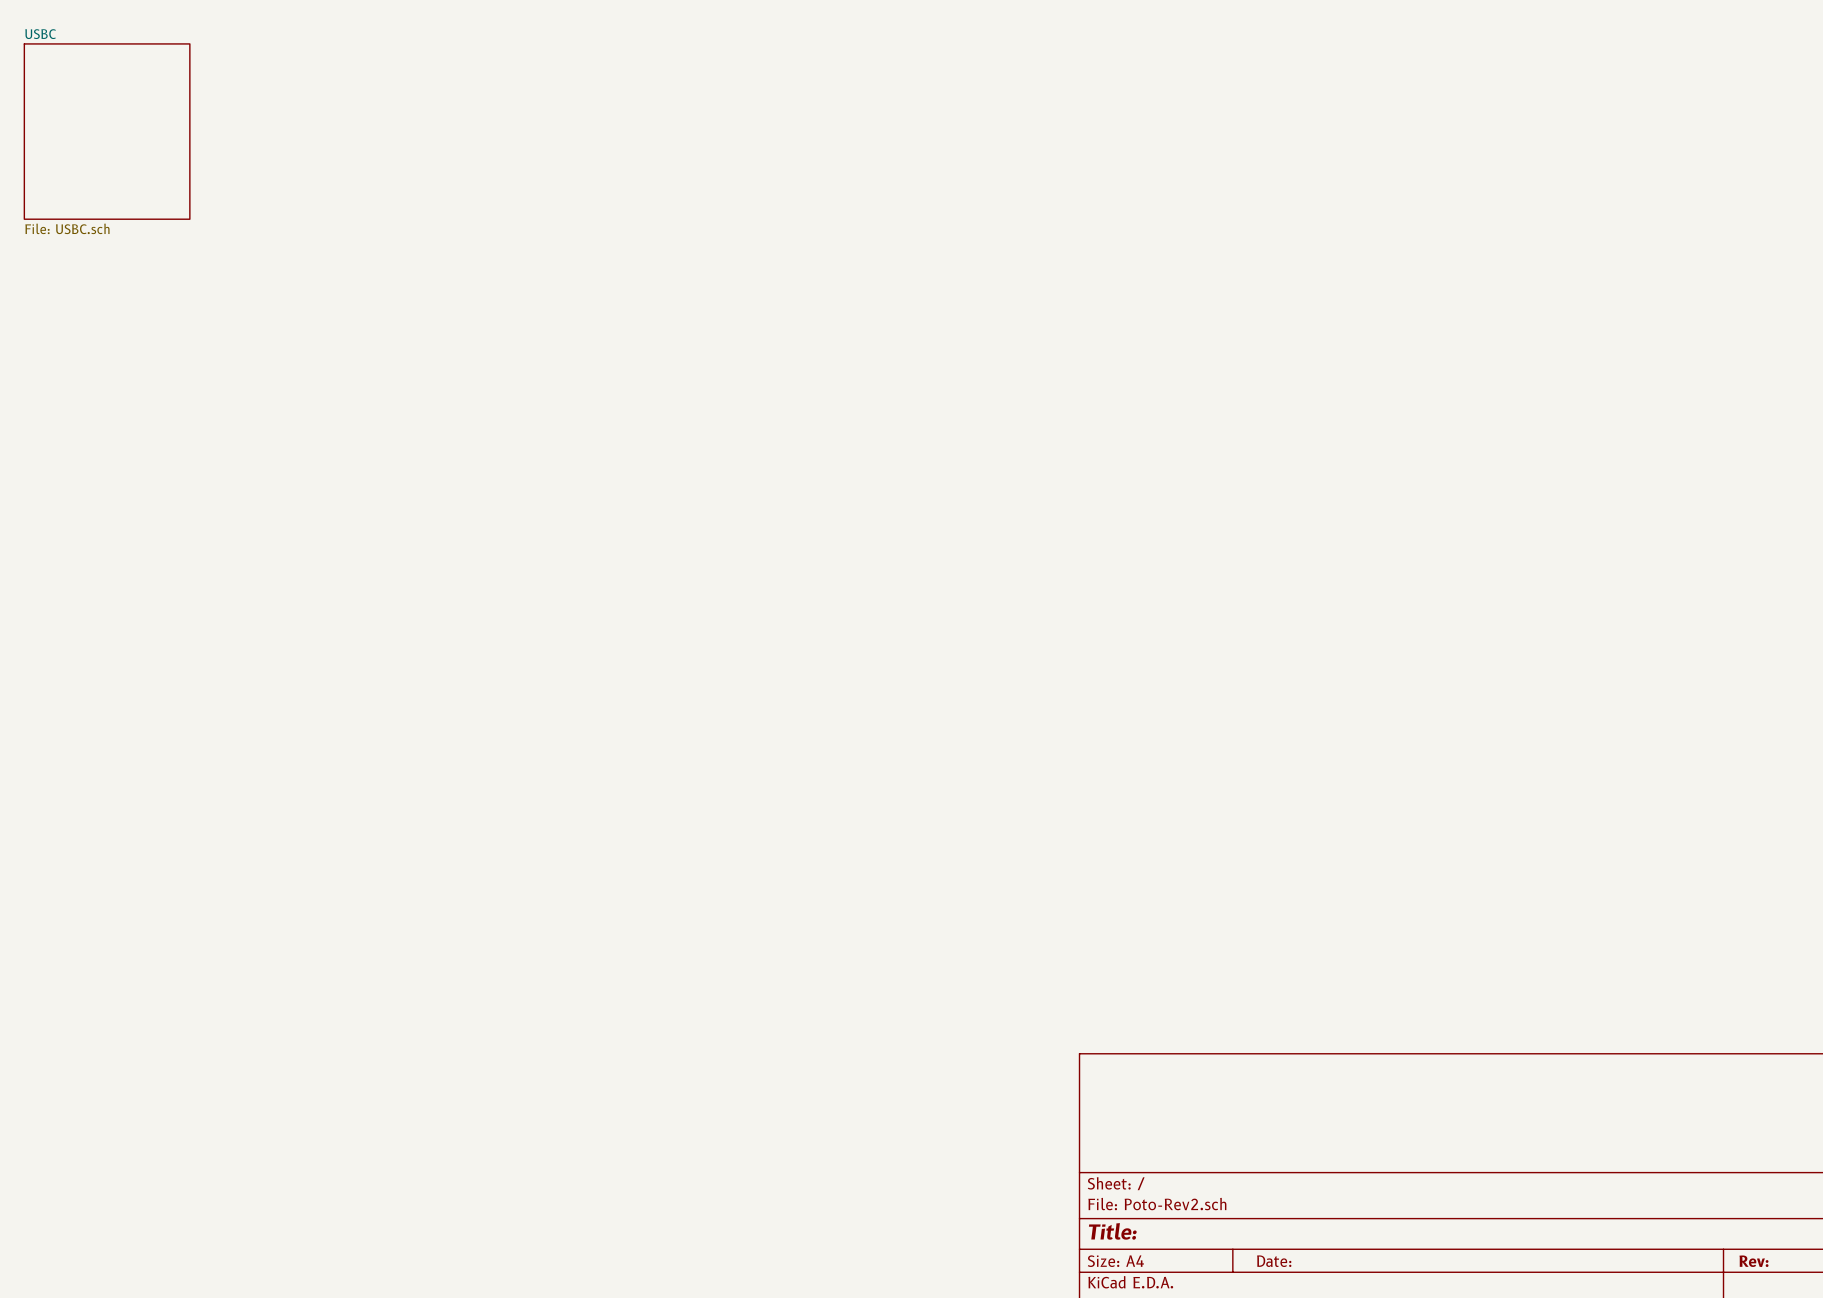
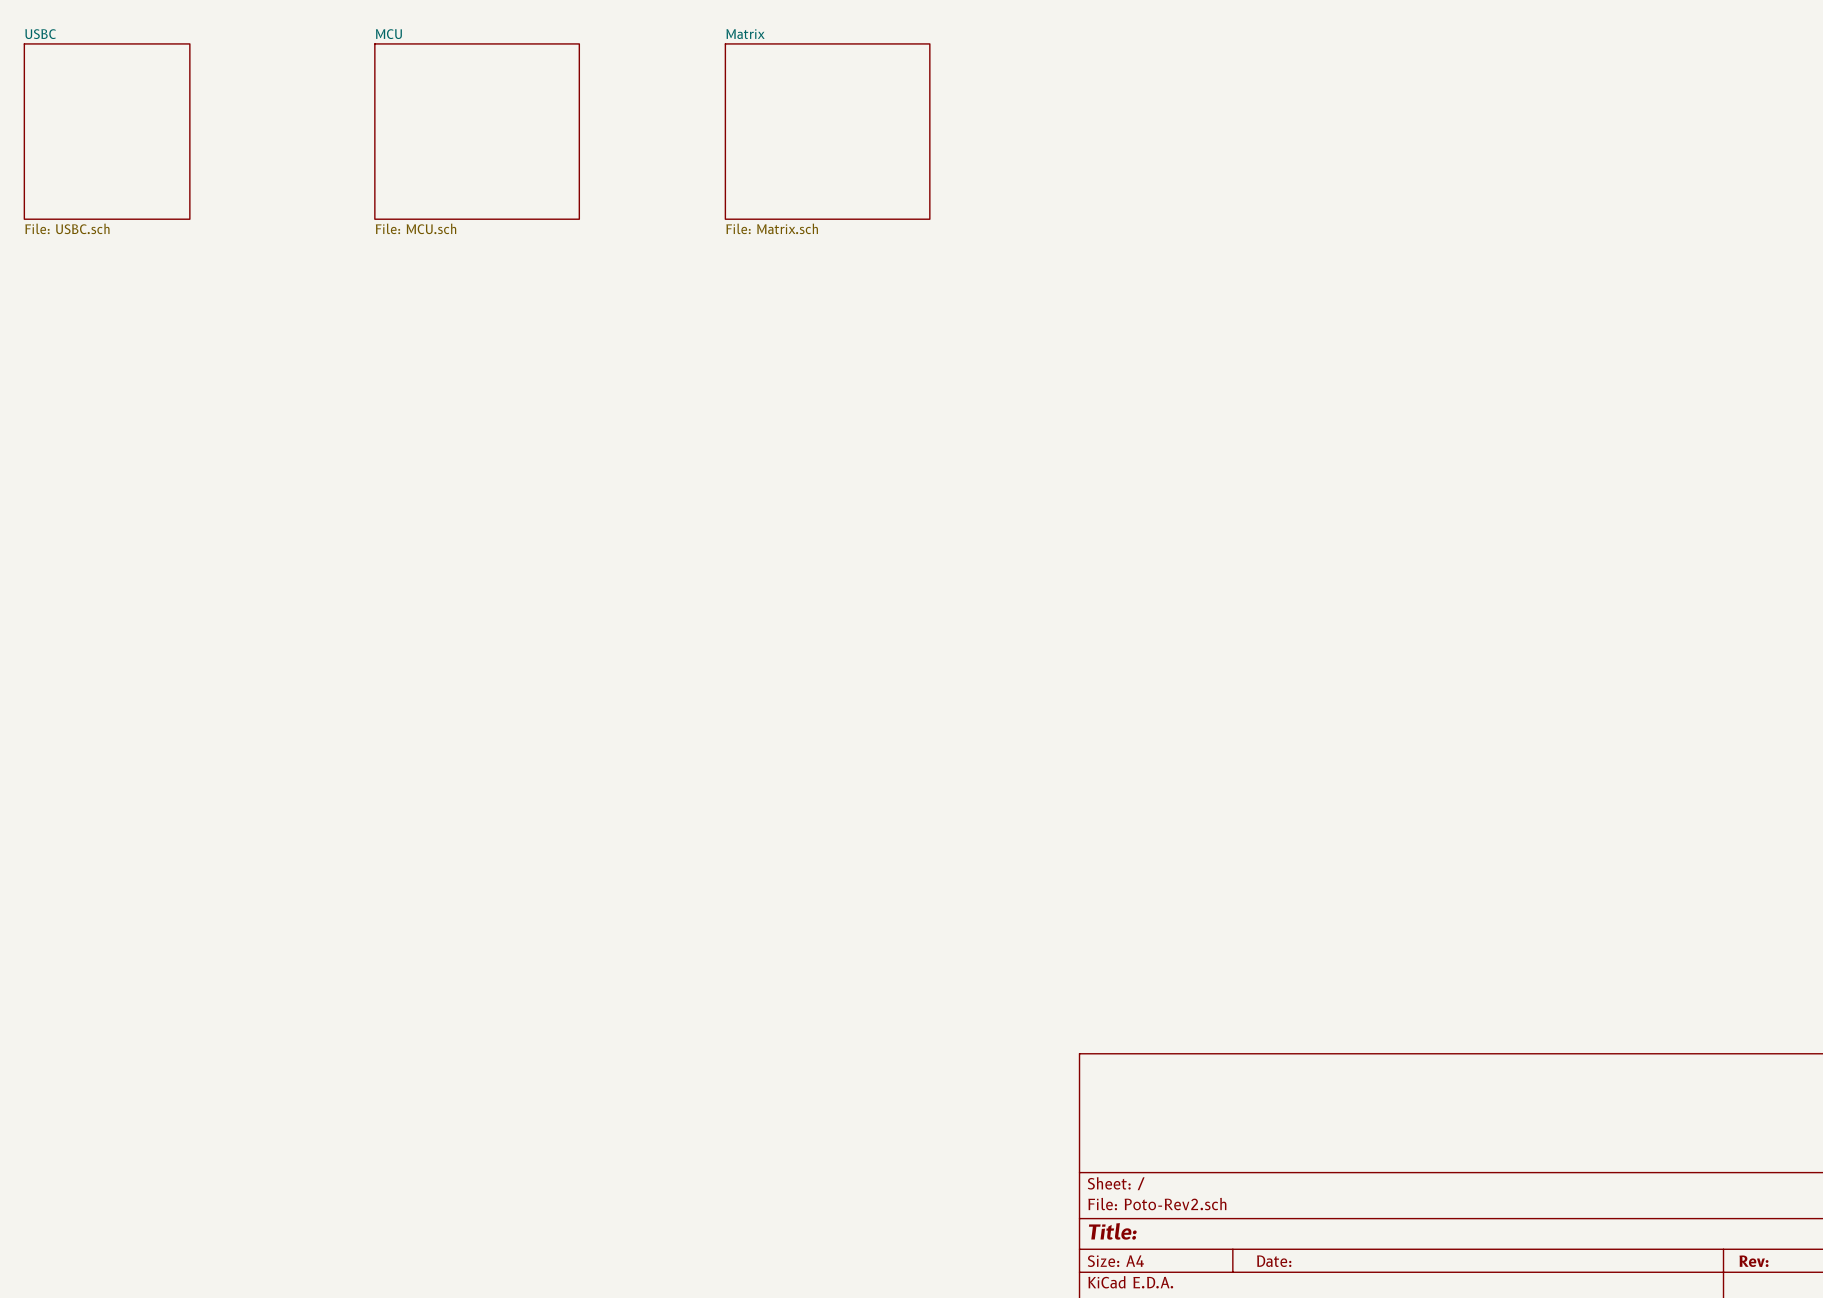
sheet MCU: none -> File: MCU.sch (477, 131)
sheet Matrix: none -> File: Matrix.sch (827, 131)

